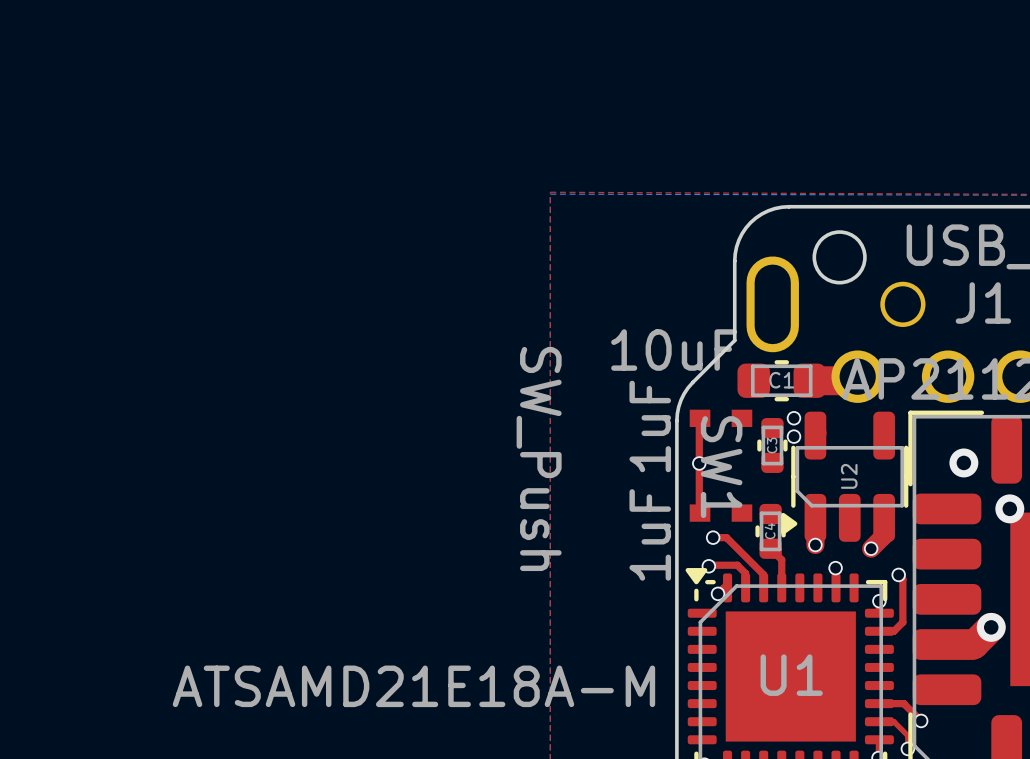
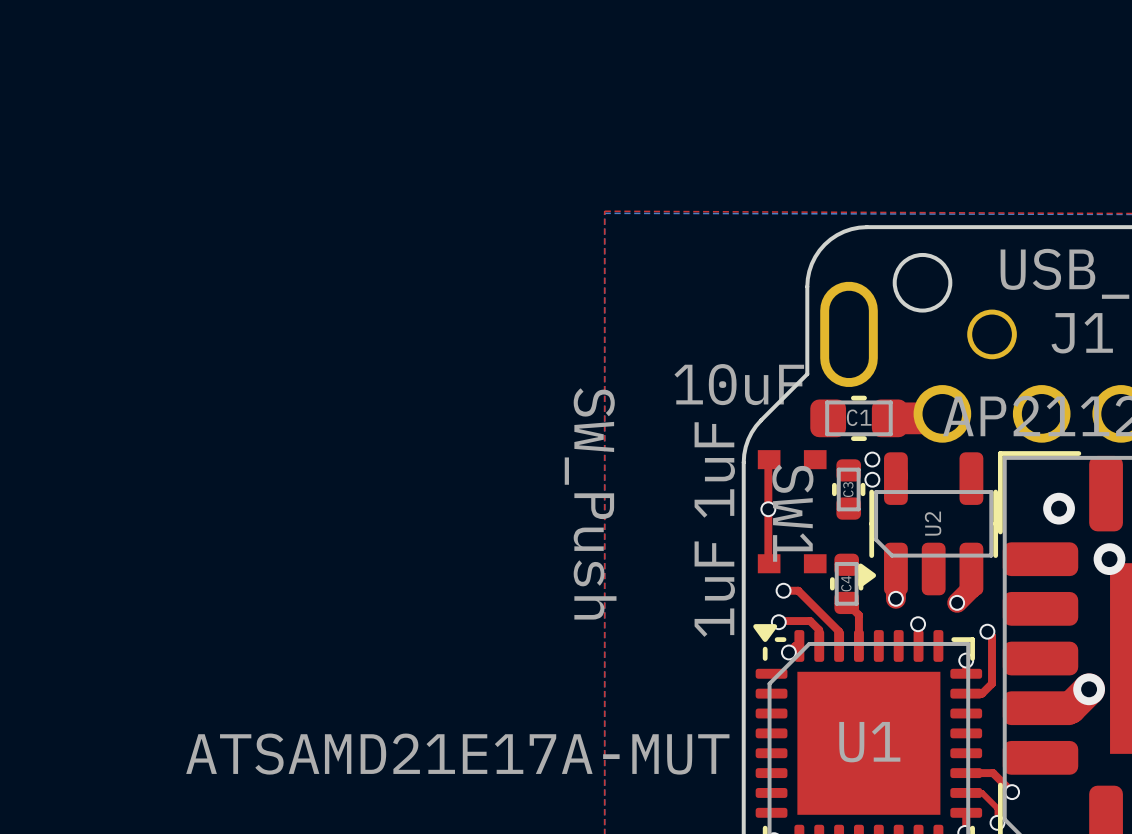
U1 value: ATSAMD21E18A-M (413, 686) -> ATSAMD21E17A-MUT (457, 754)

